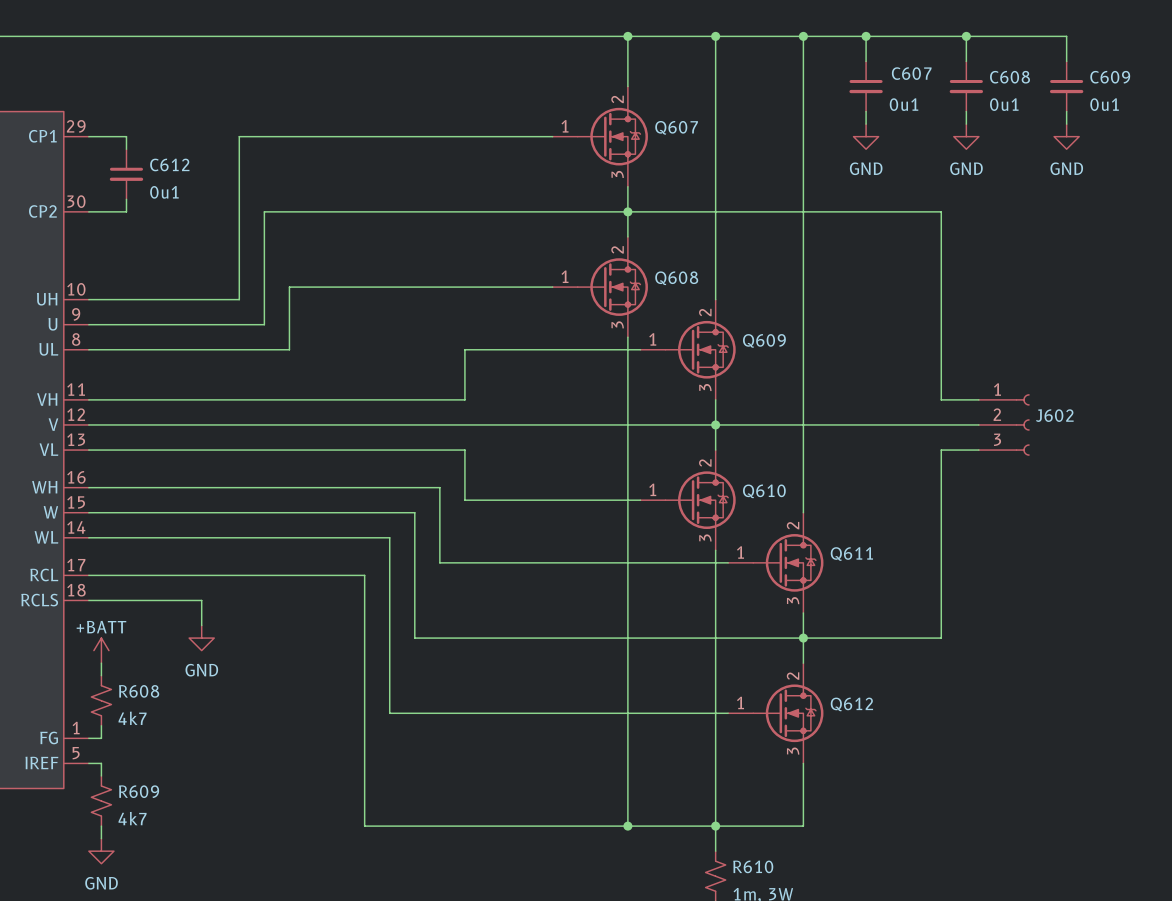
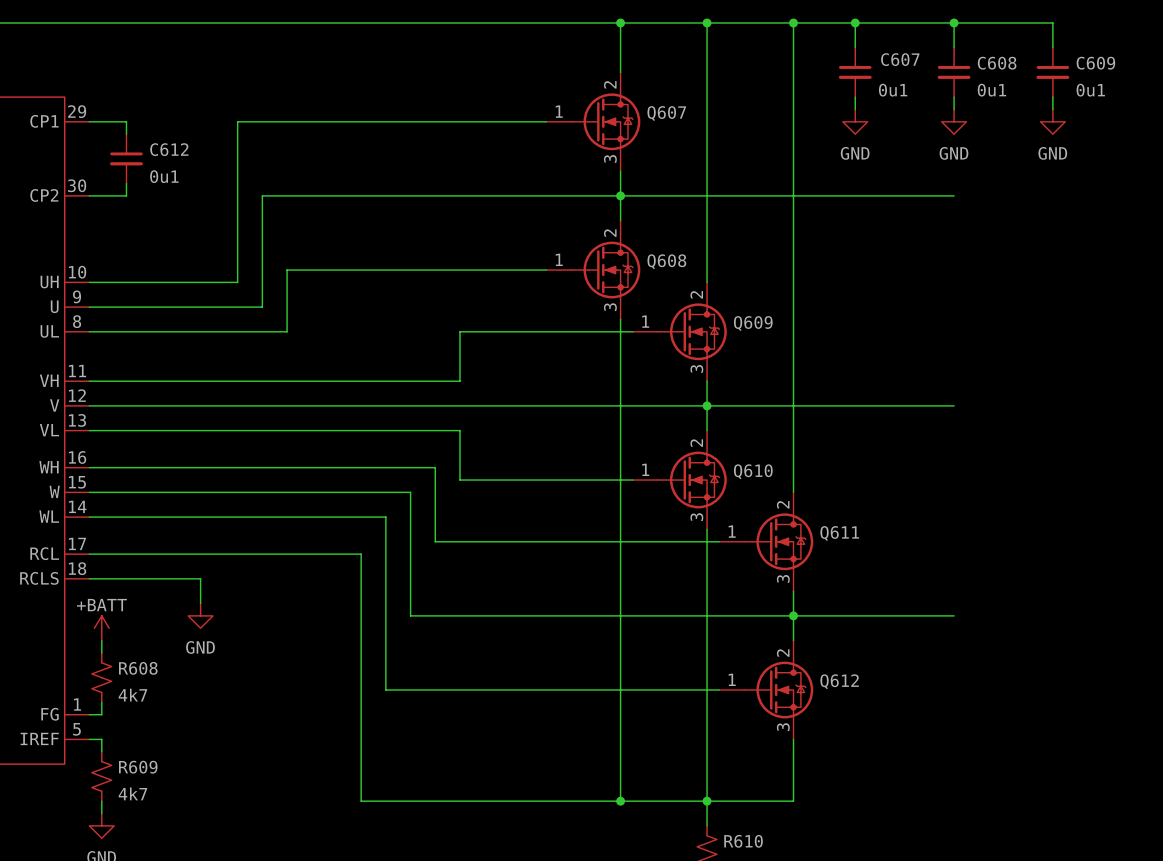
wire: (941, 211) (941, 399) (978, 399) -> (929, 195) (954, 195)
wire: (966, 424) (978, 424) -> none
J602: (1004, 424) -> none
wire: (978, 450) (941, 450) (941, 638) -> (954, 615) (929, 615)

